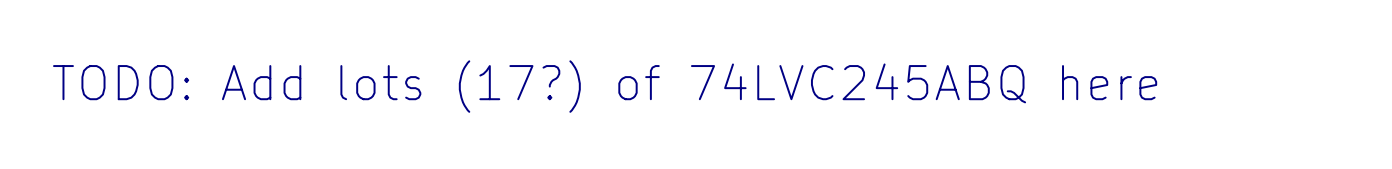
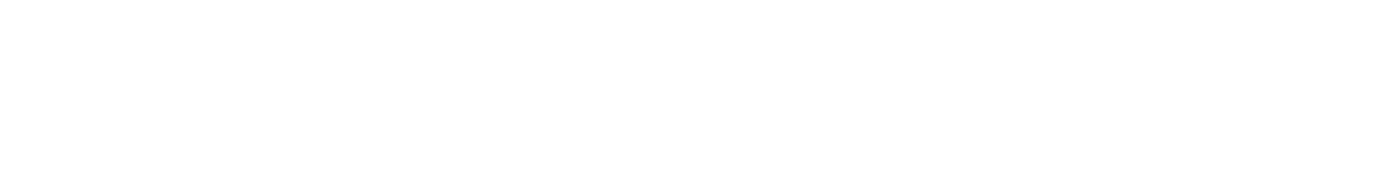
text: TODO: Add lots (17?) of 74LVC245ABQ here (605, 86) -> none

